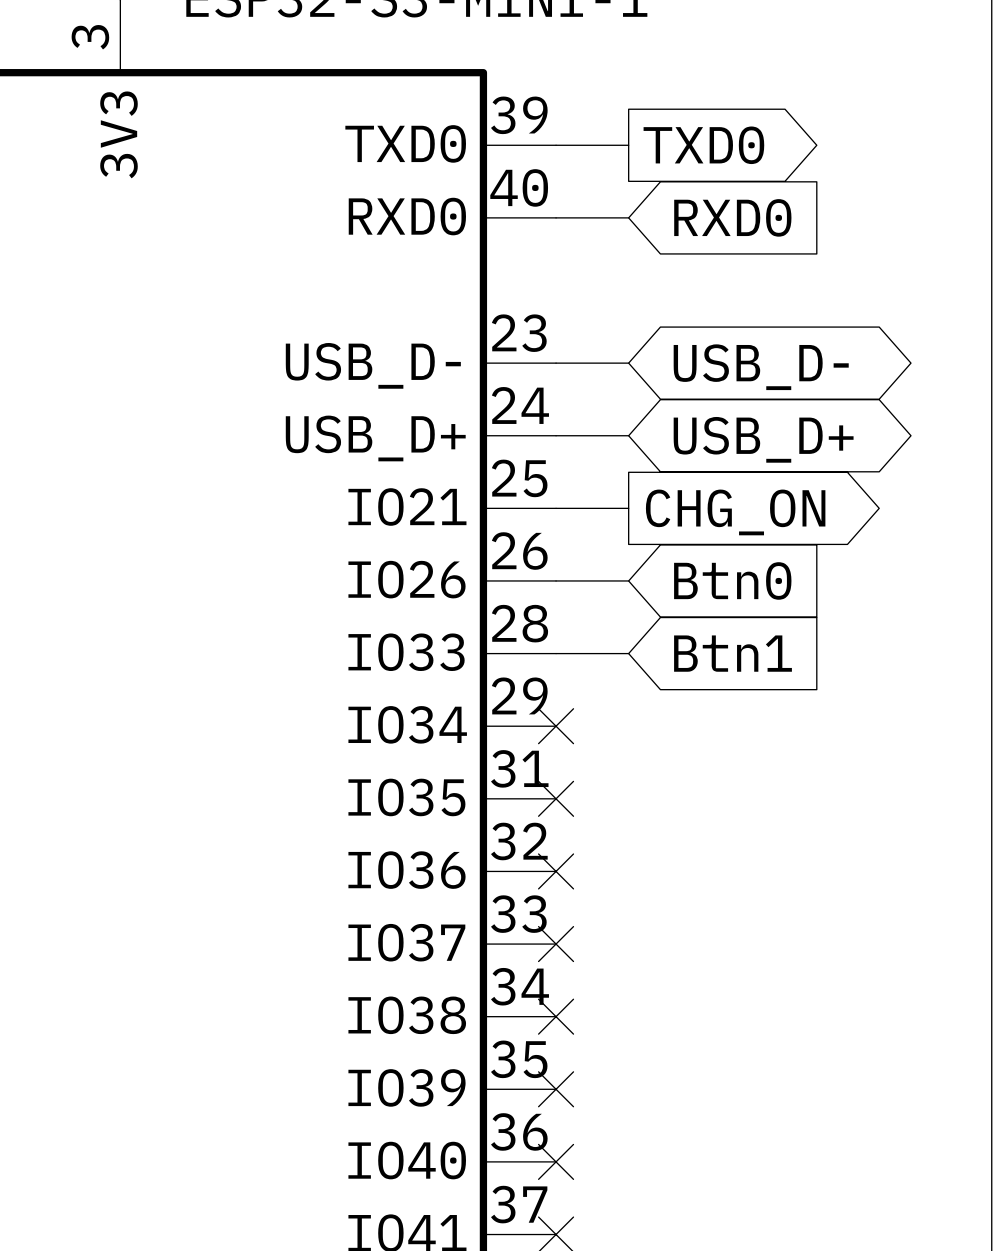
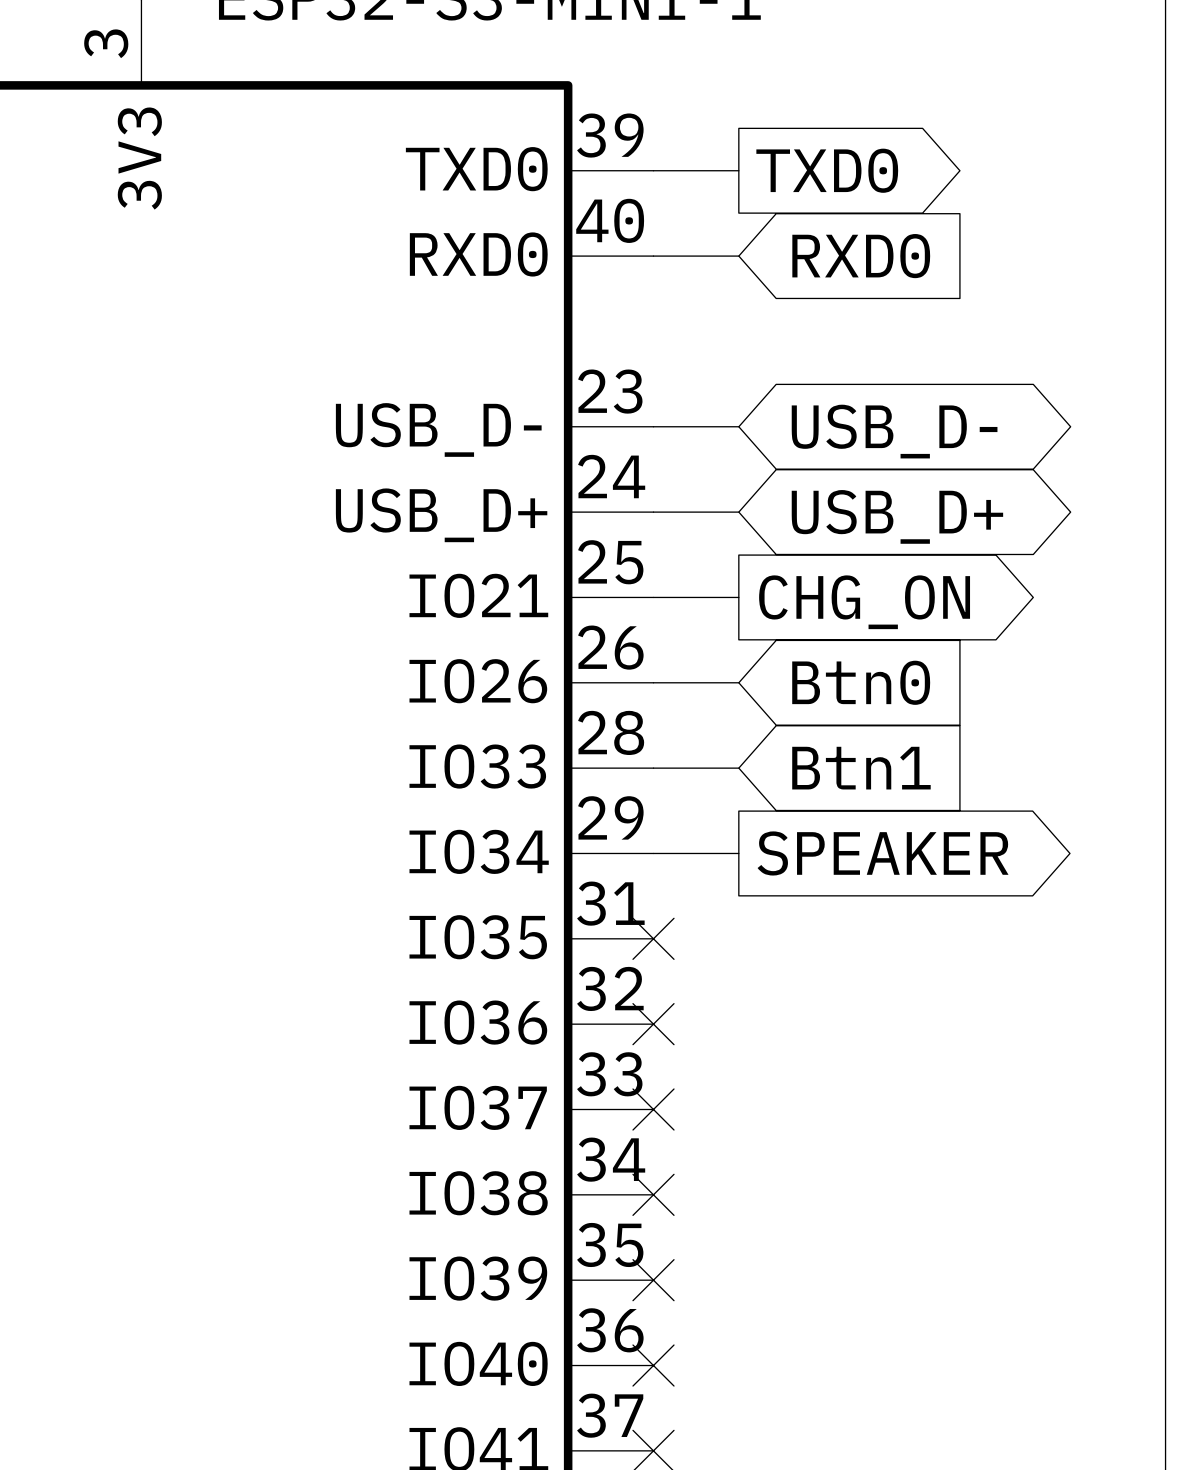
wire: none -> (653, 853) (738, 853)
no-connect mark: (556, 726) -> none
global label: none -> SPEAKER (883, 853)

